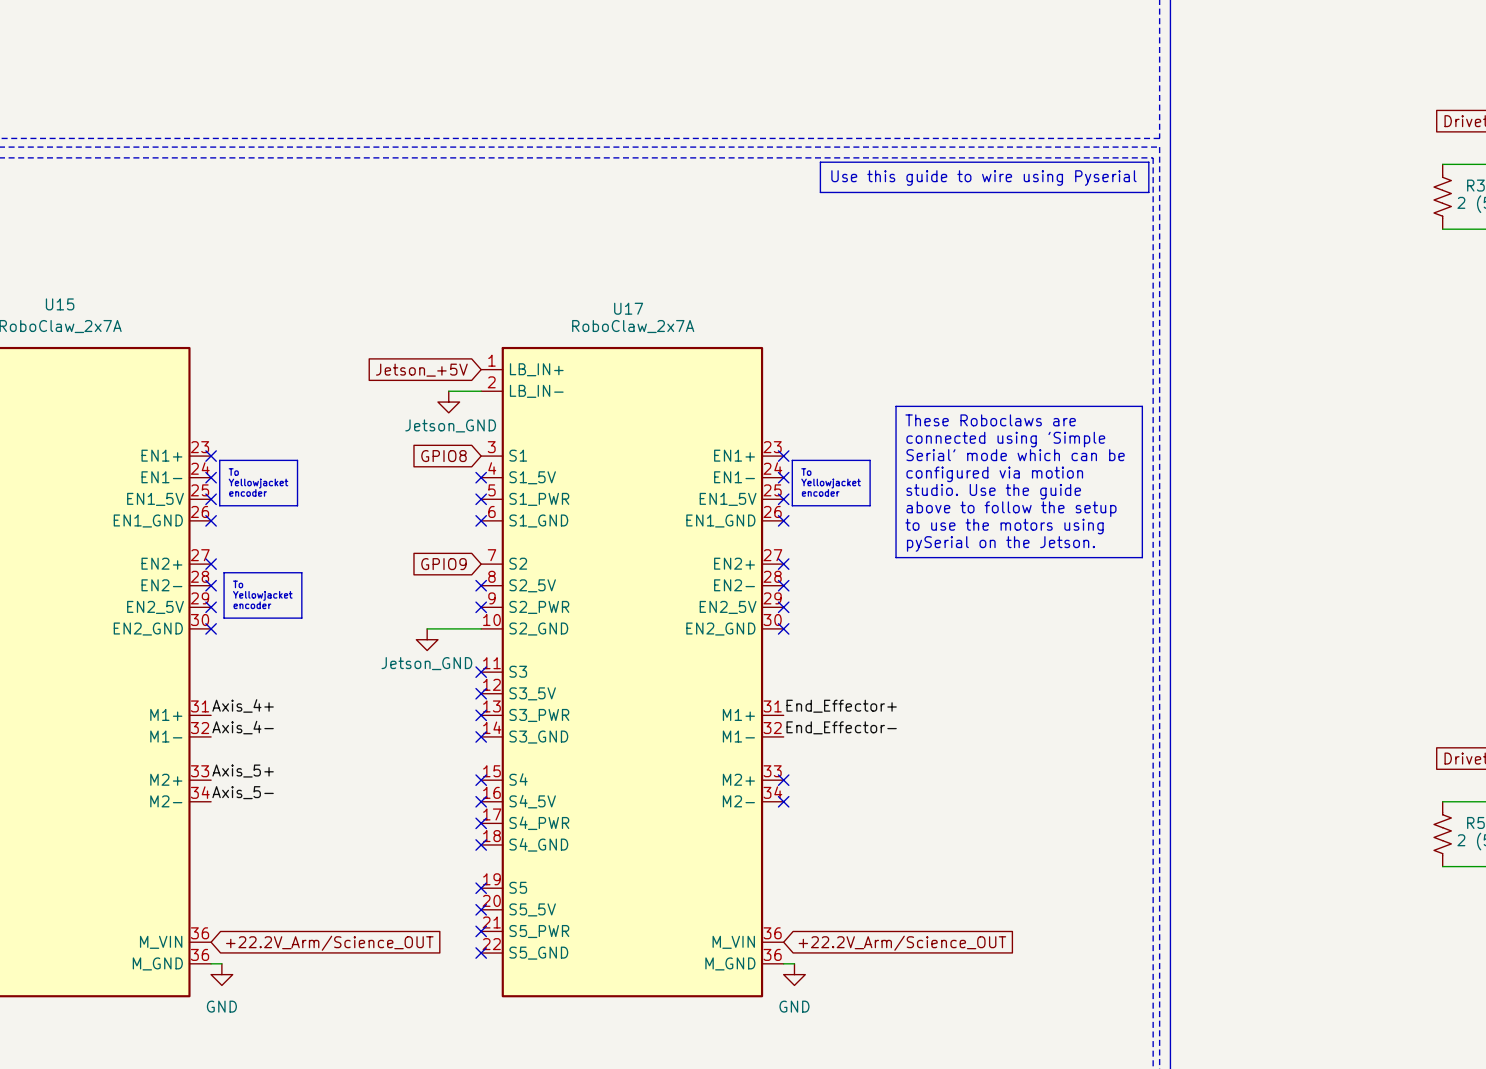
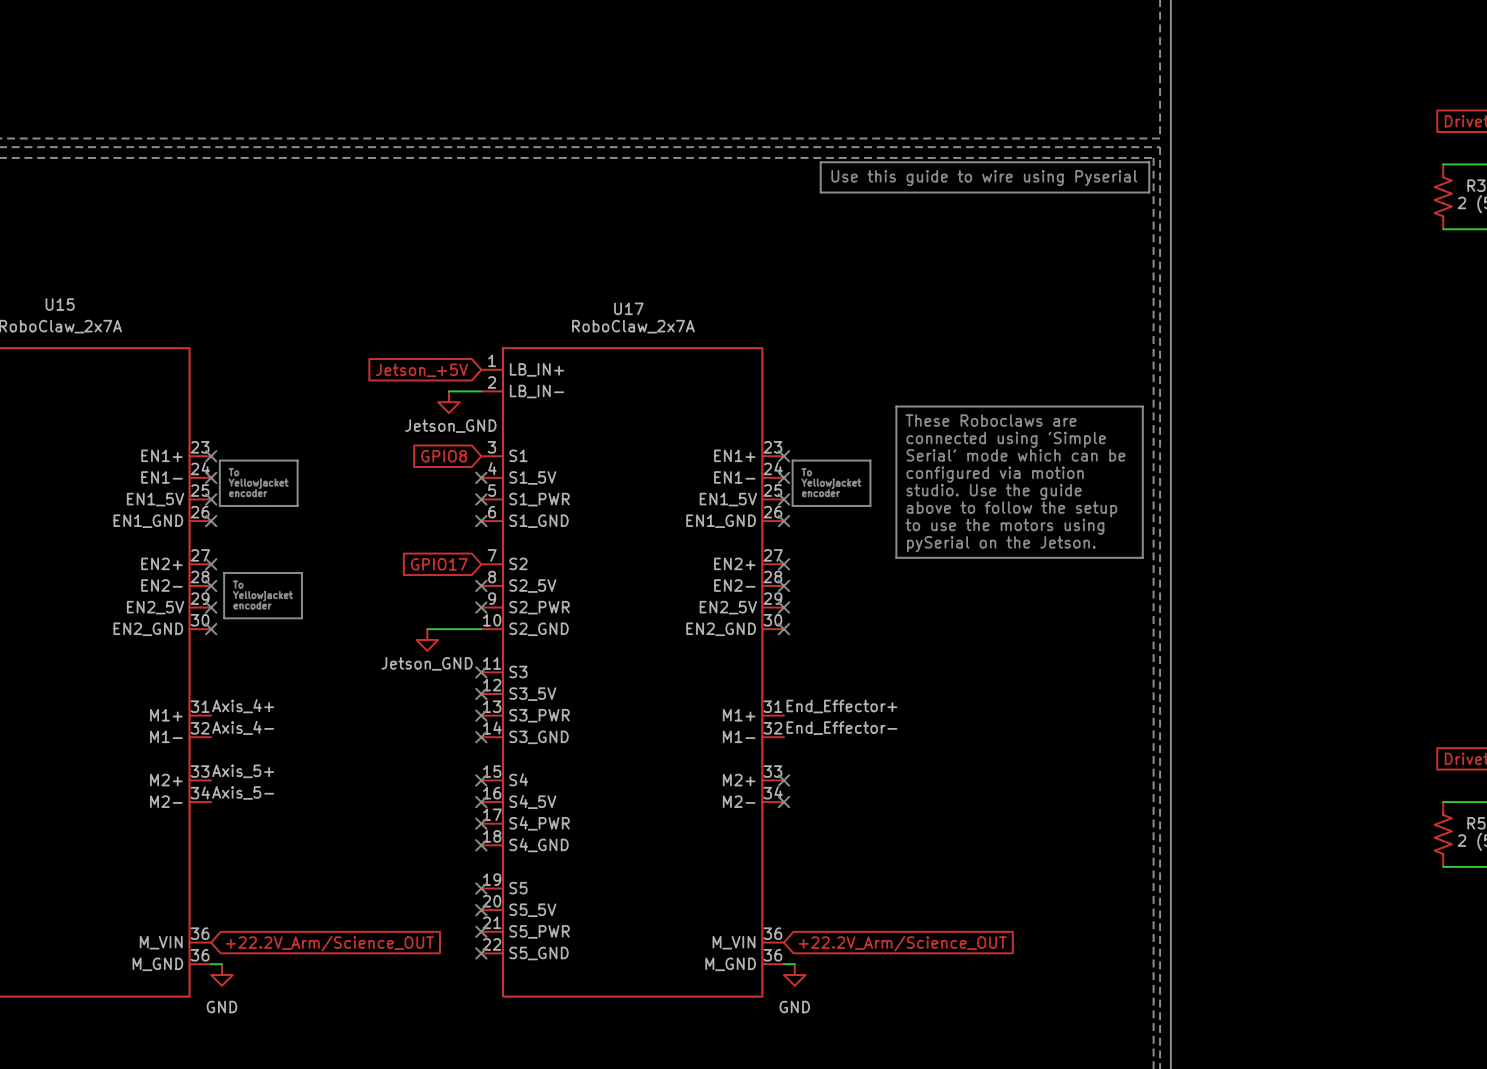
global label: GPIO9 (443, 564) -> GPIO17 (439, 564)

